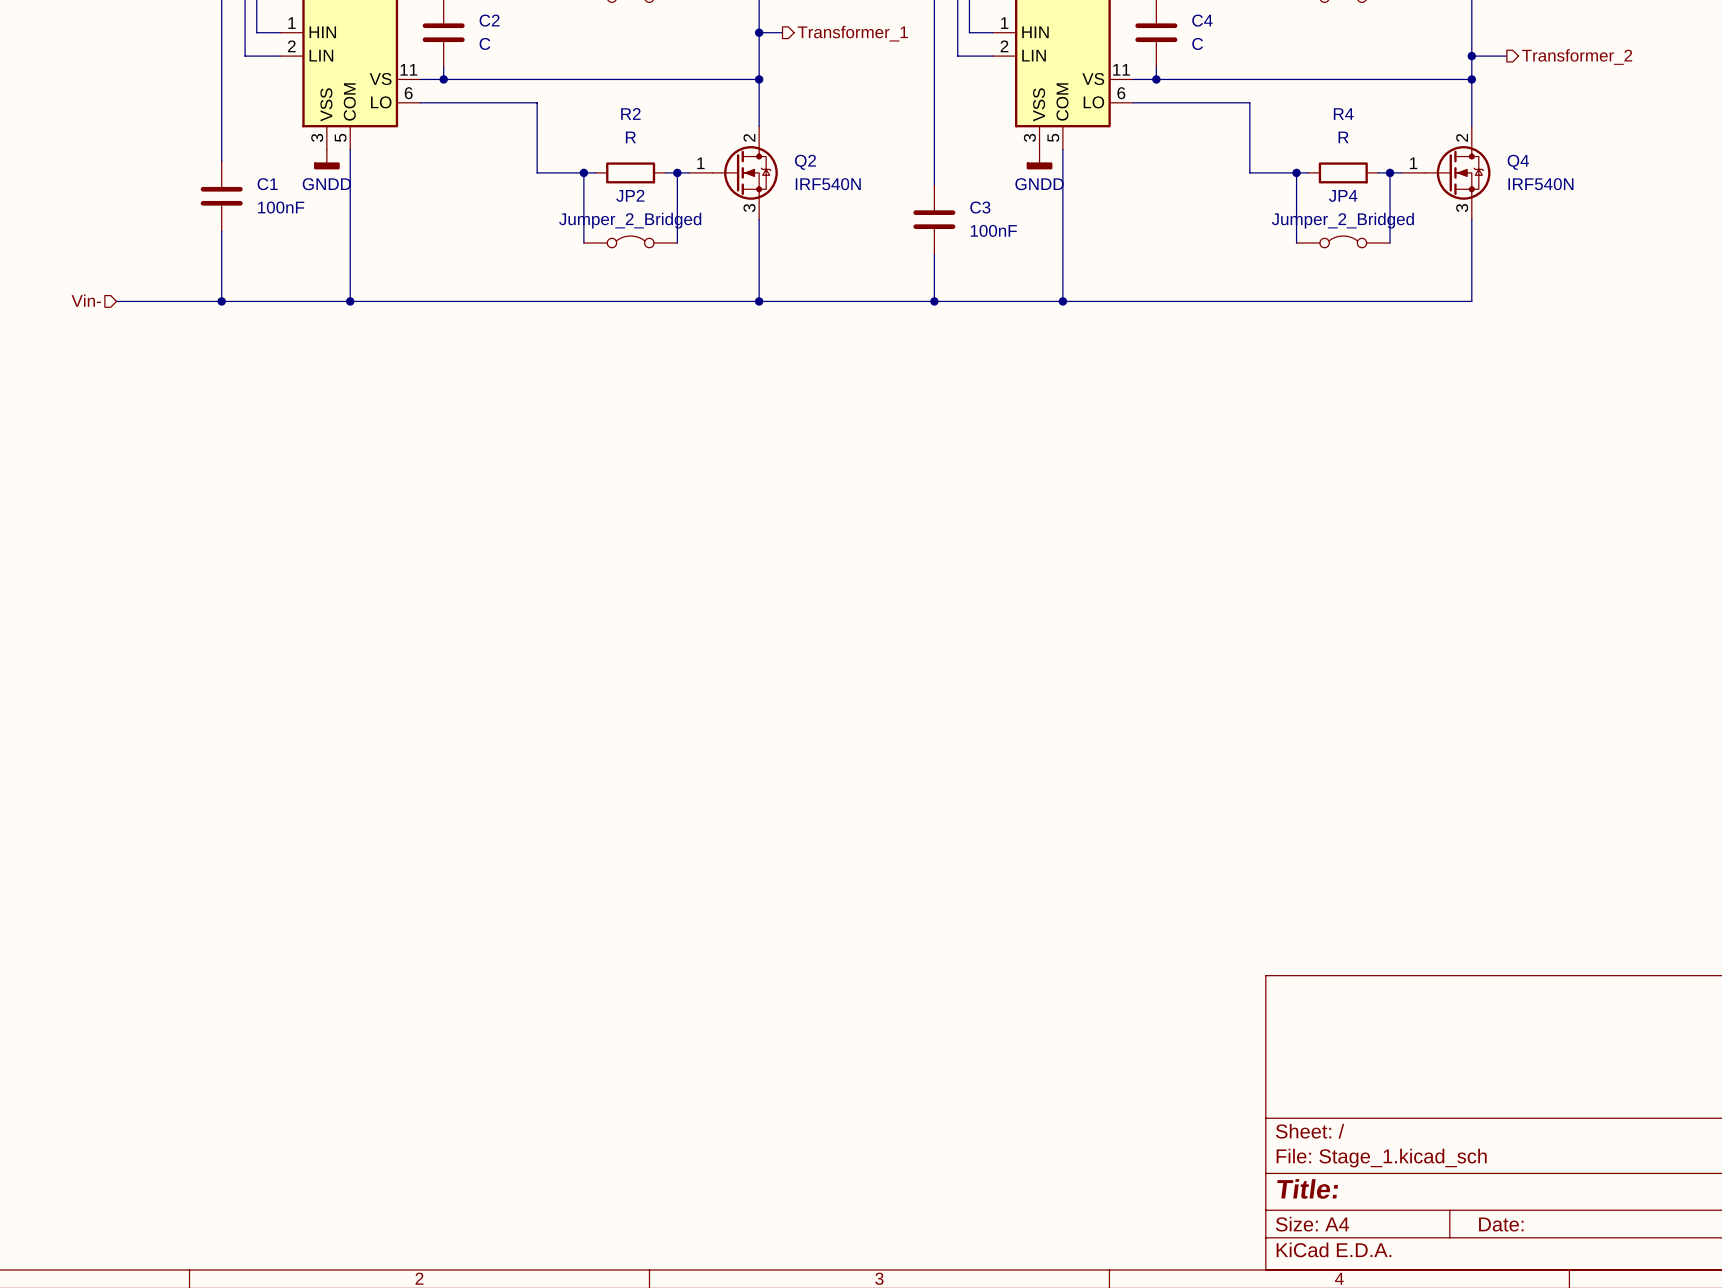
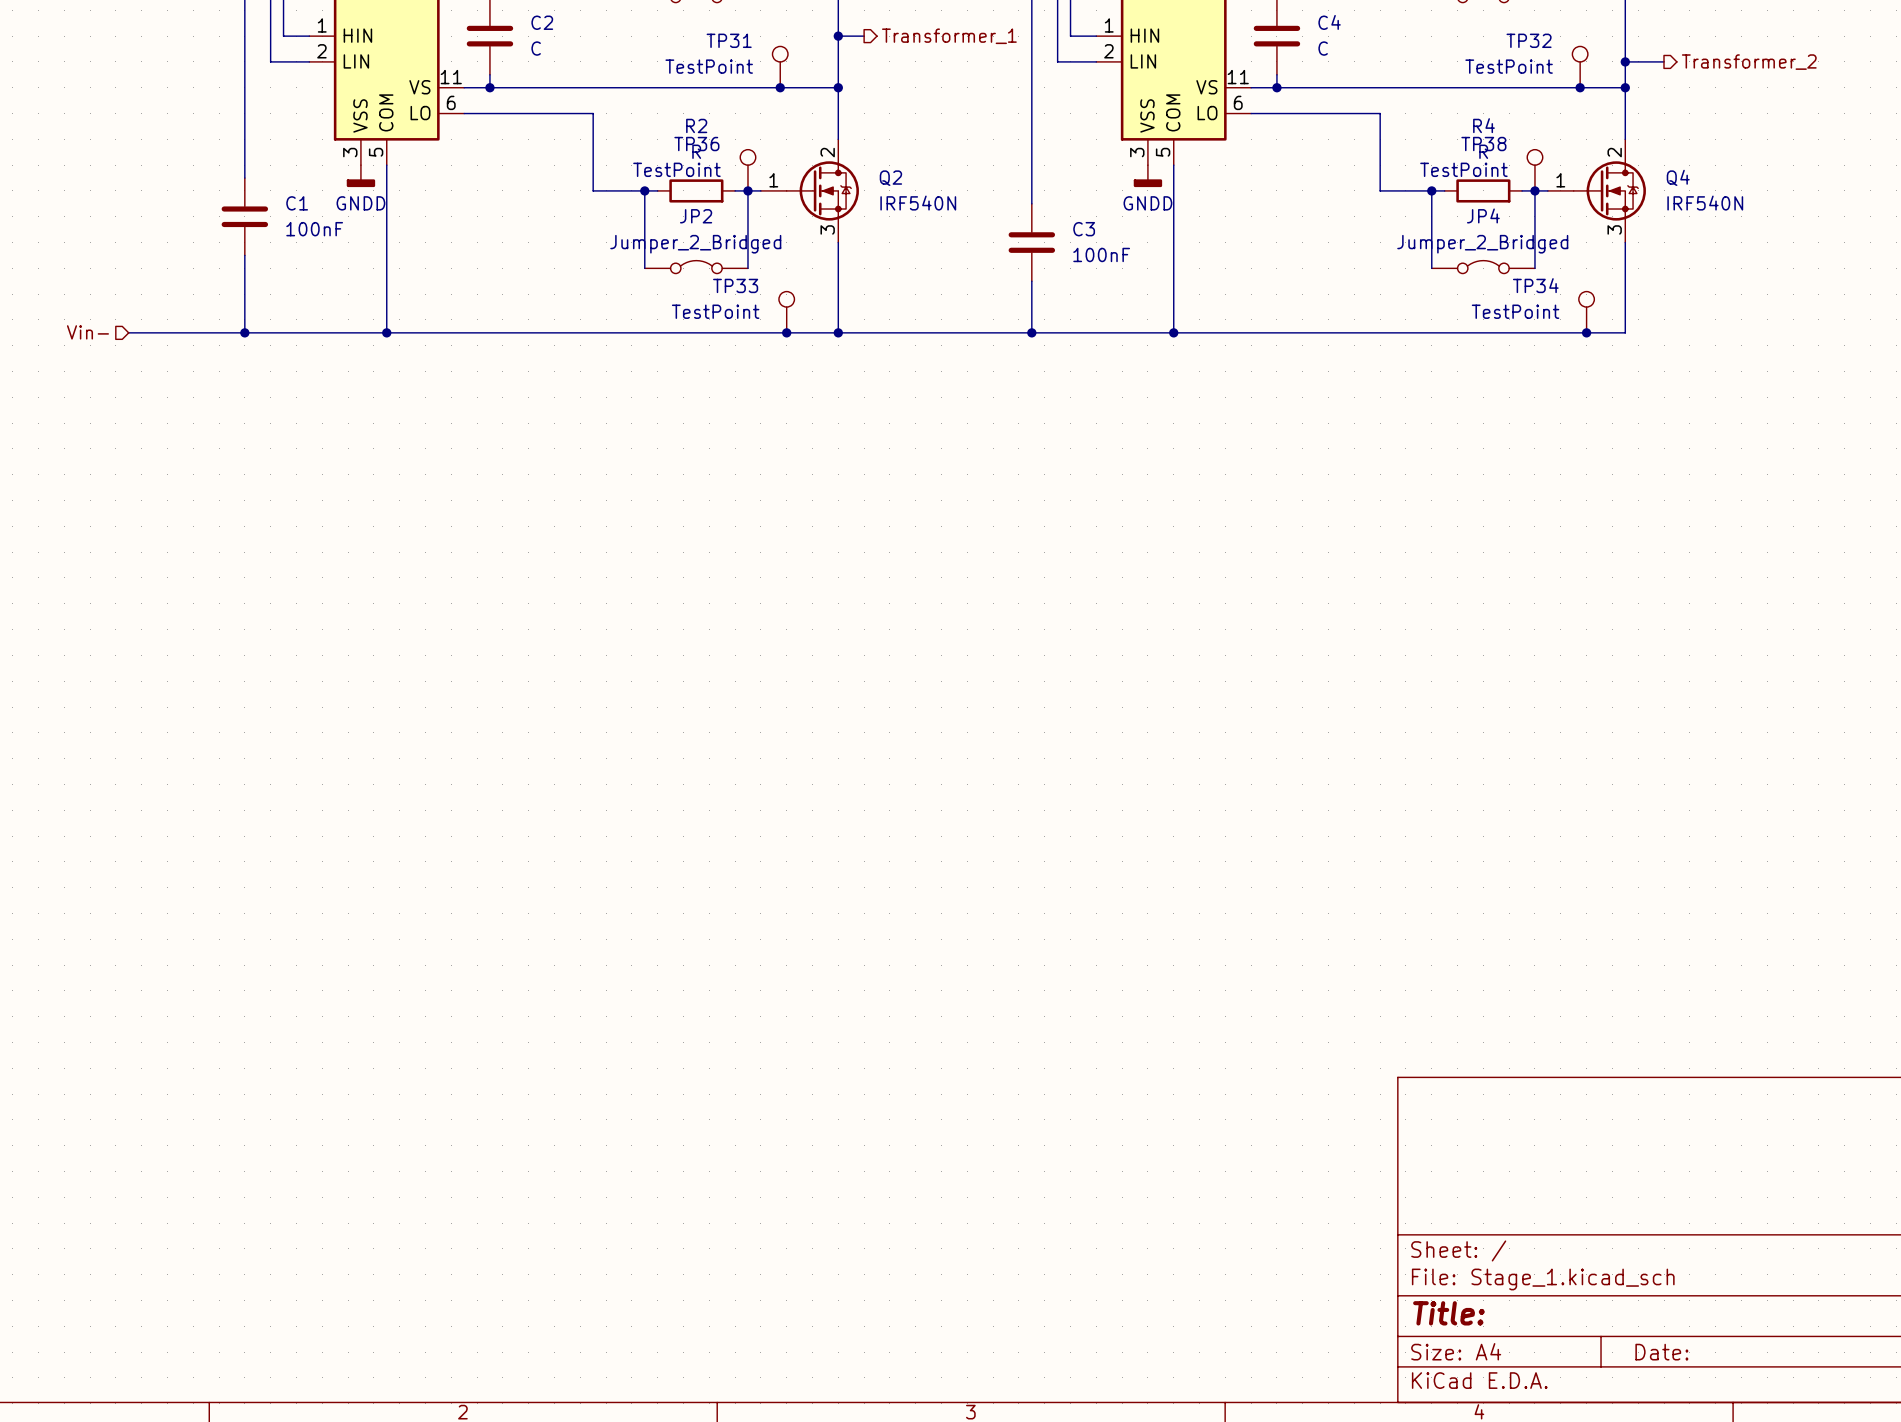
TP31: none -> TestPoint (780, 67)
TP32: none -> TestPoint (1580, 67)
junction: none -> (780, 87)
junction: none -> (1580, 87)
TP36: none -> TestPoint (747, 170)
TP38: none -> TestPoint (1534, 170)
TP33: none -> TestPoint (786, 312)
TP34: none -> TestPoint (1586, 312)
junction: none -> (786, 332)
junction: none -> (1586, 332)

